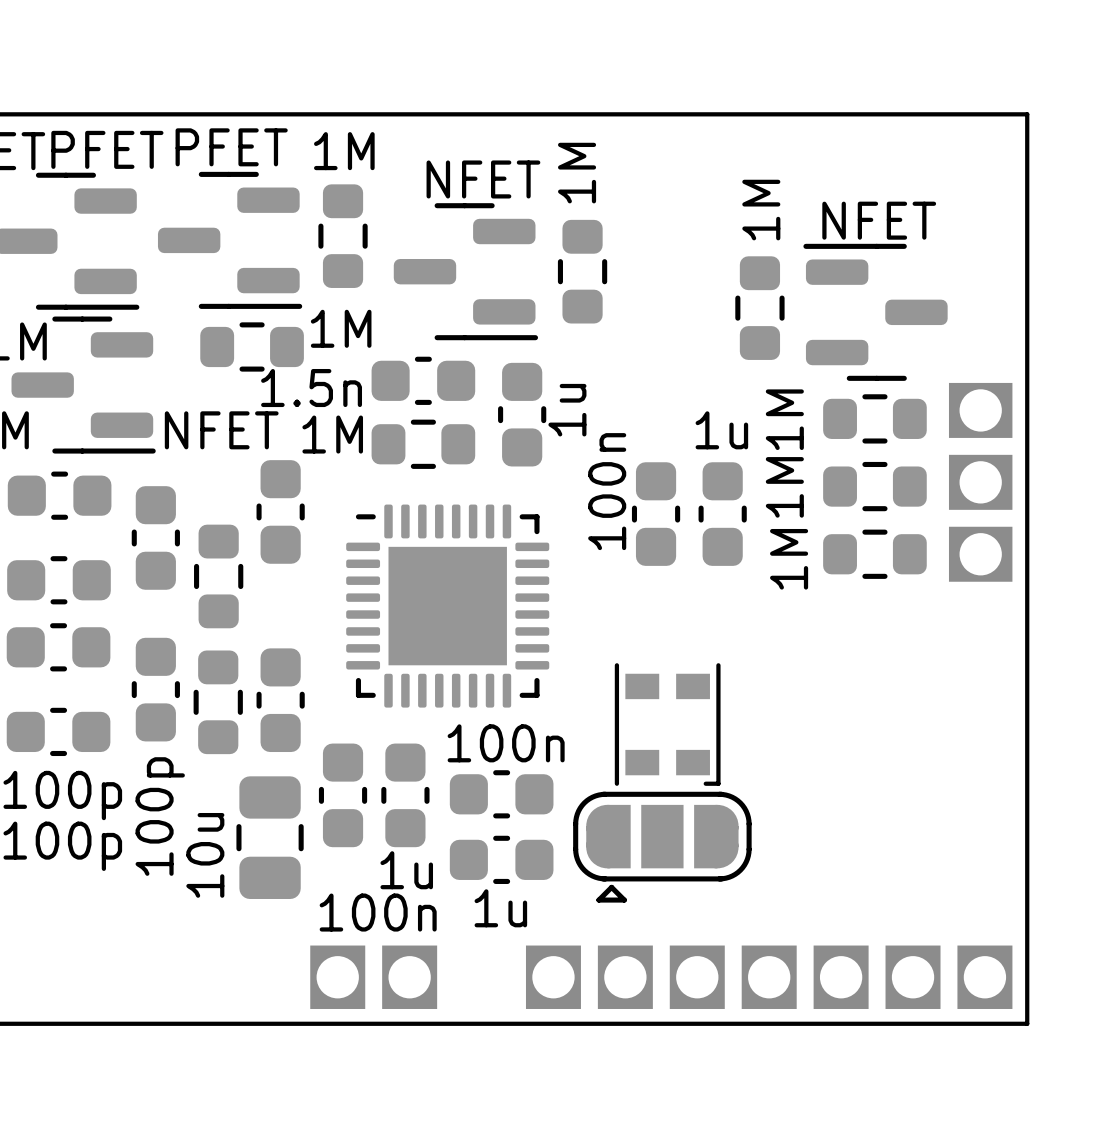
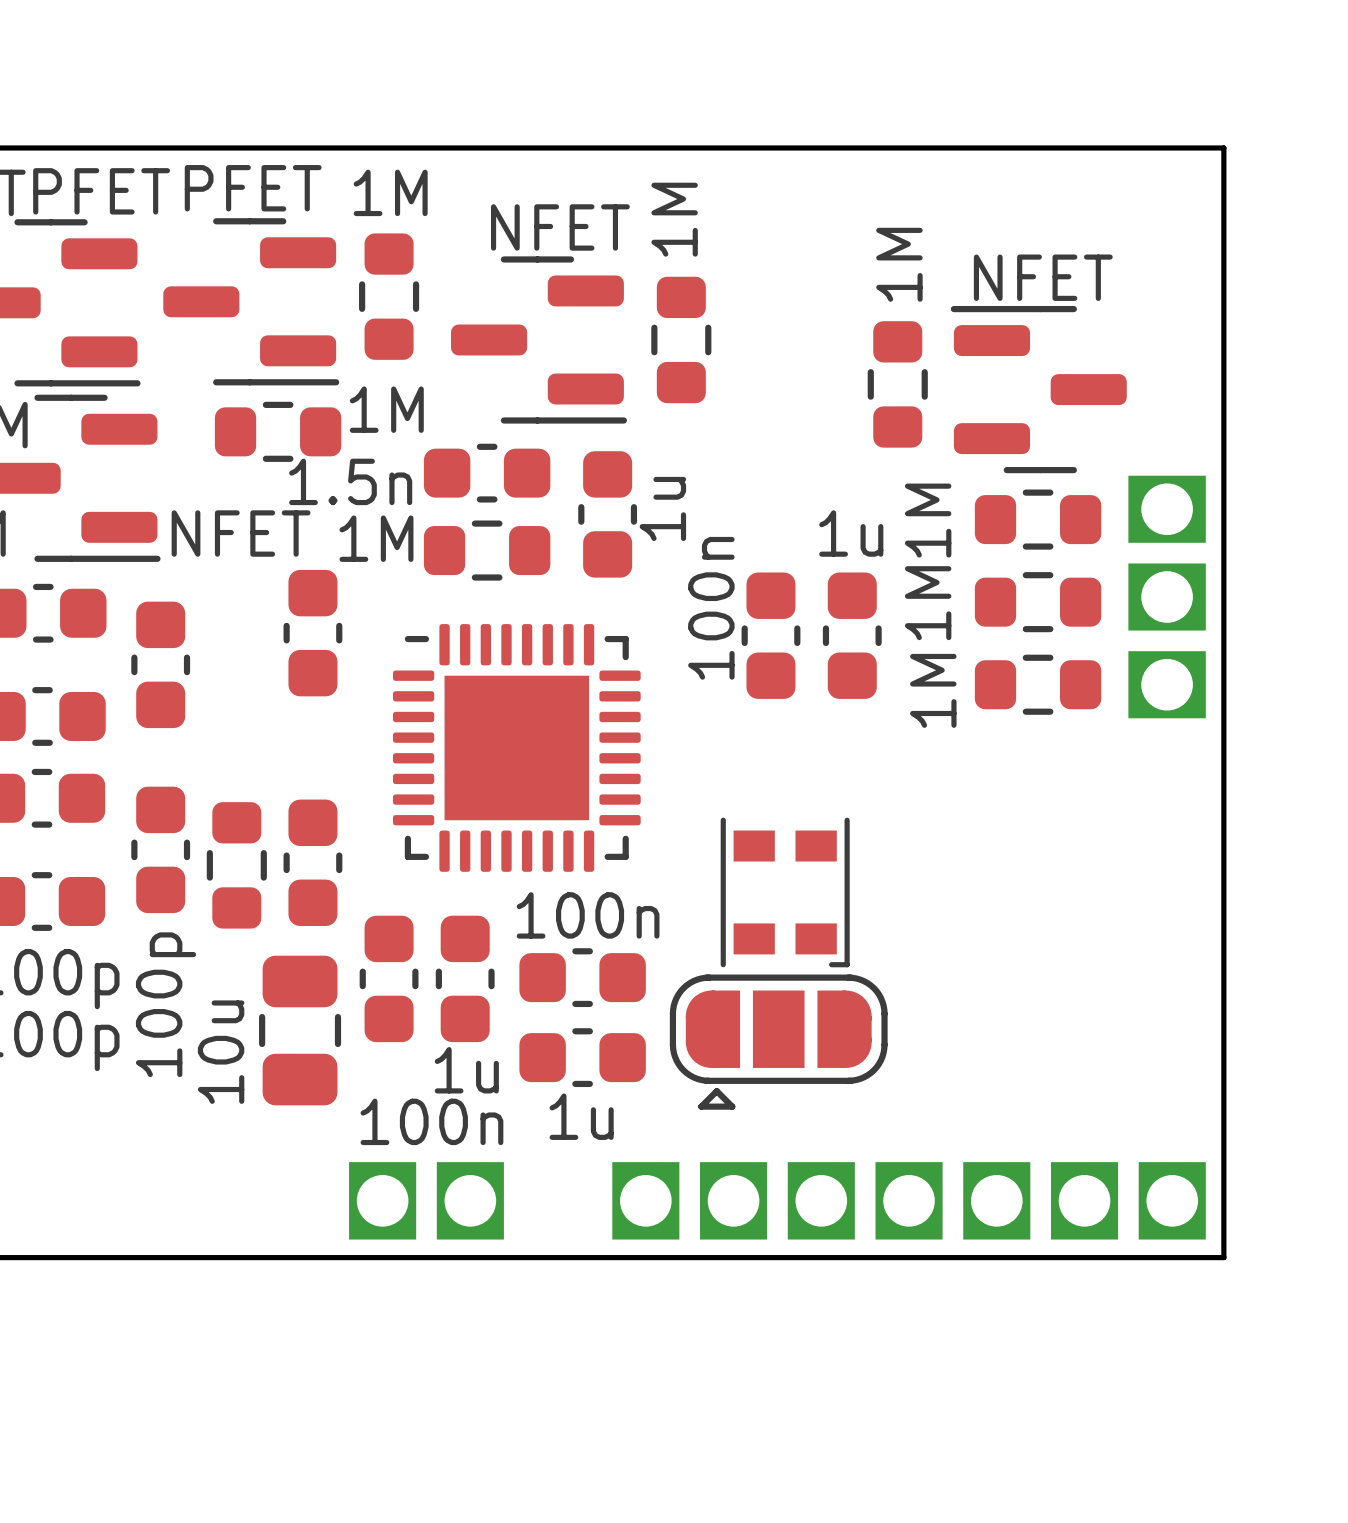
part: (218, 576) -> none

